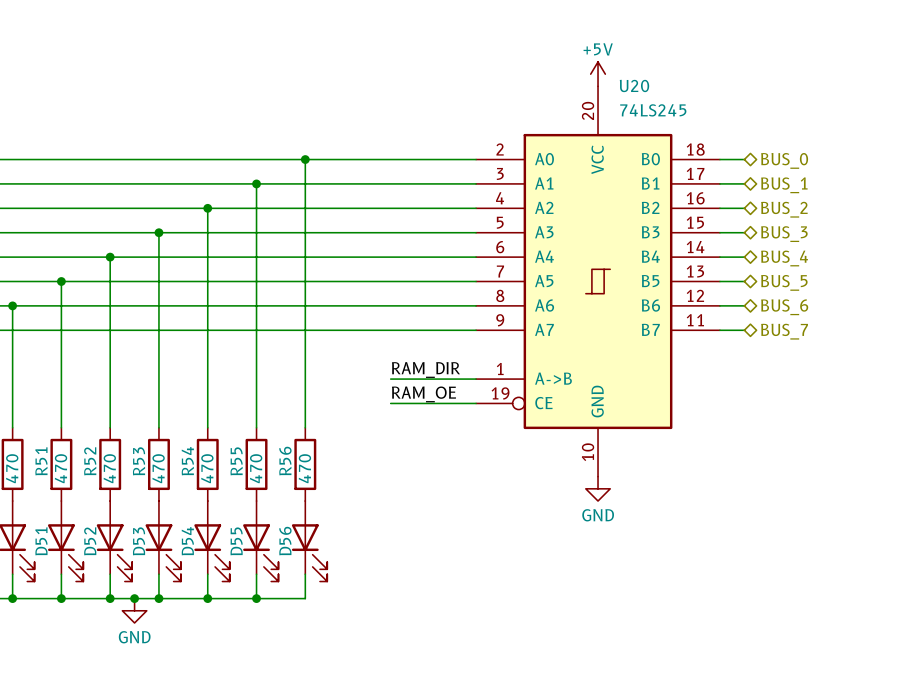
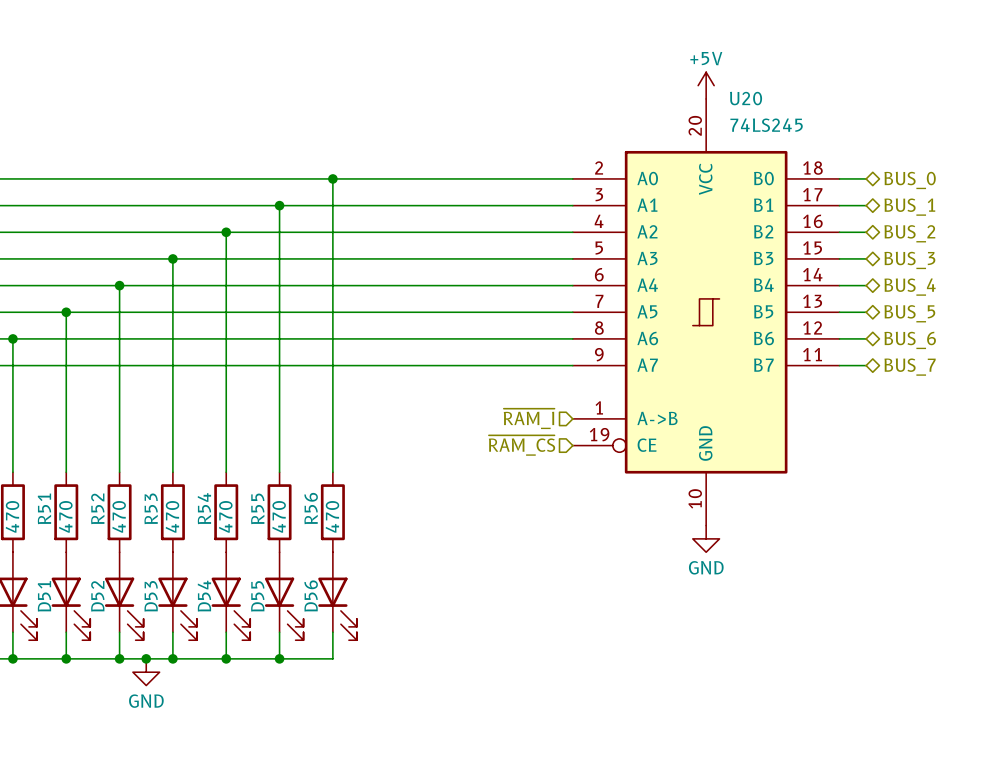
power symbol position: +5V (598, 74) -> +5V (706, 85)
hierarchical label position: BUS_0 (784, 160) -> BUS_0 (910, 180)
hierarchical label position: BUS_1 (784, 185) -> BUS_1 (909, 207)
hierarchical label position: BUS_2 (784, 209) -> BUS_2 (909, 233)
hierarchical label position: BUS_3 (784, 234) -> BUS_3 (909, 260)
hierarchical label position: BUS_4 (784, 258) -> BUS_4 (910, 287)
U20 position: (598, 281) -> (706, 312)
hierarchical label position: BUS_5 (784, 282) -> BUS_5 (909, 313)
hierarchical label position: BUS_6 (784, 307) -> BUS_6 (910, 340)
hierarchical label position: BUS_7 (784, 331) -> BUS_7 (910, 367)
label: RAM_DIR (425, 370) -> none
wire: (390, 379) (476, 379) -> none
hierarchical label: none -> ~{RAM_I} (529, 418)
label: RAM_OE (423, 394) -> none
wire: (390, 403) (476, 403) -> none
hierarchical label: none -> ~{RAM_CS} (521, 445)
power symbol position: GND (598, 488) -> GND (706, 538)

